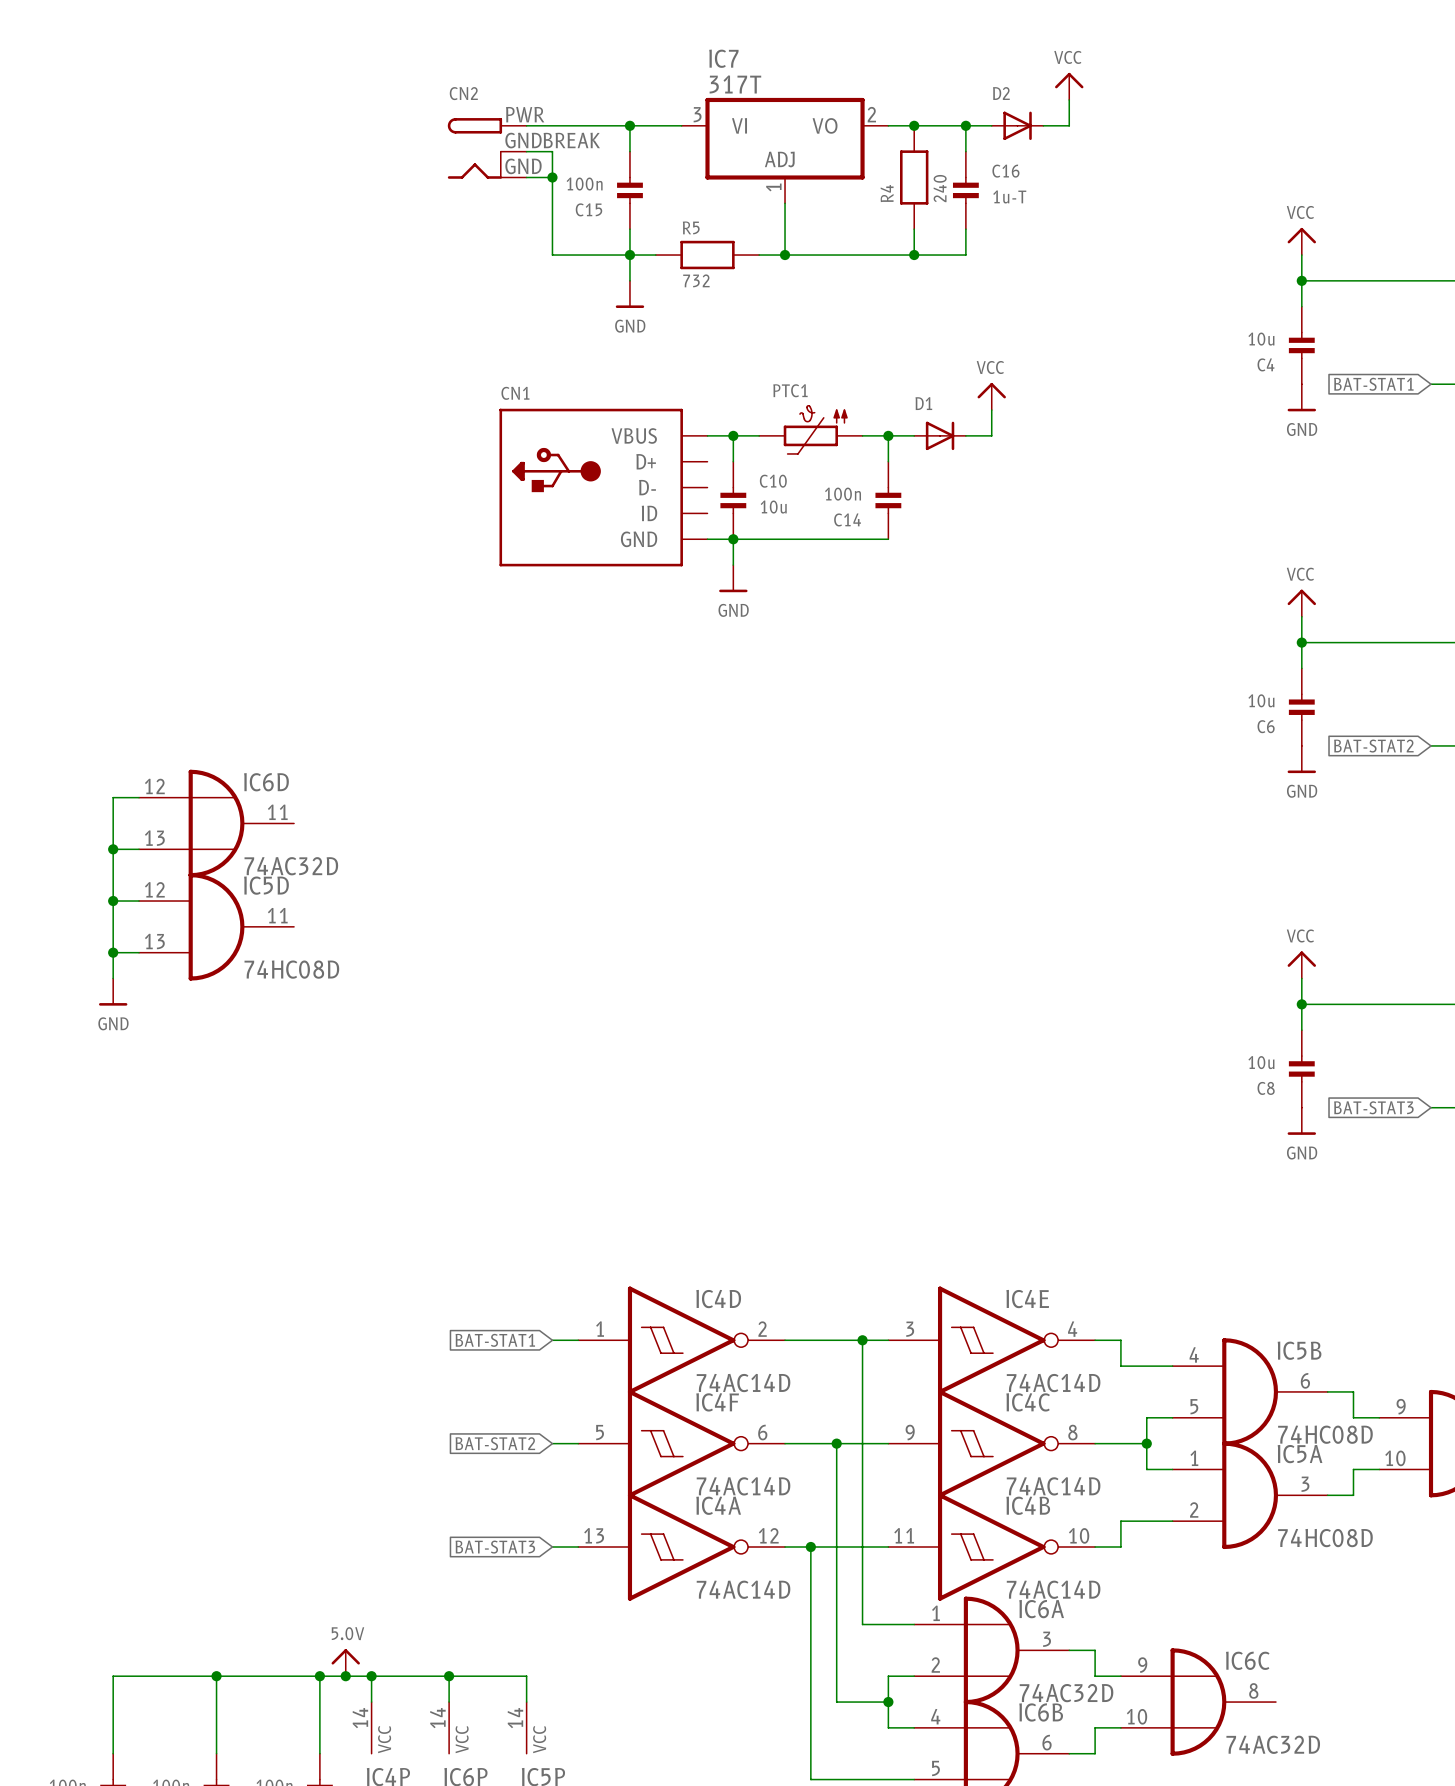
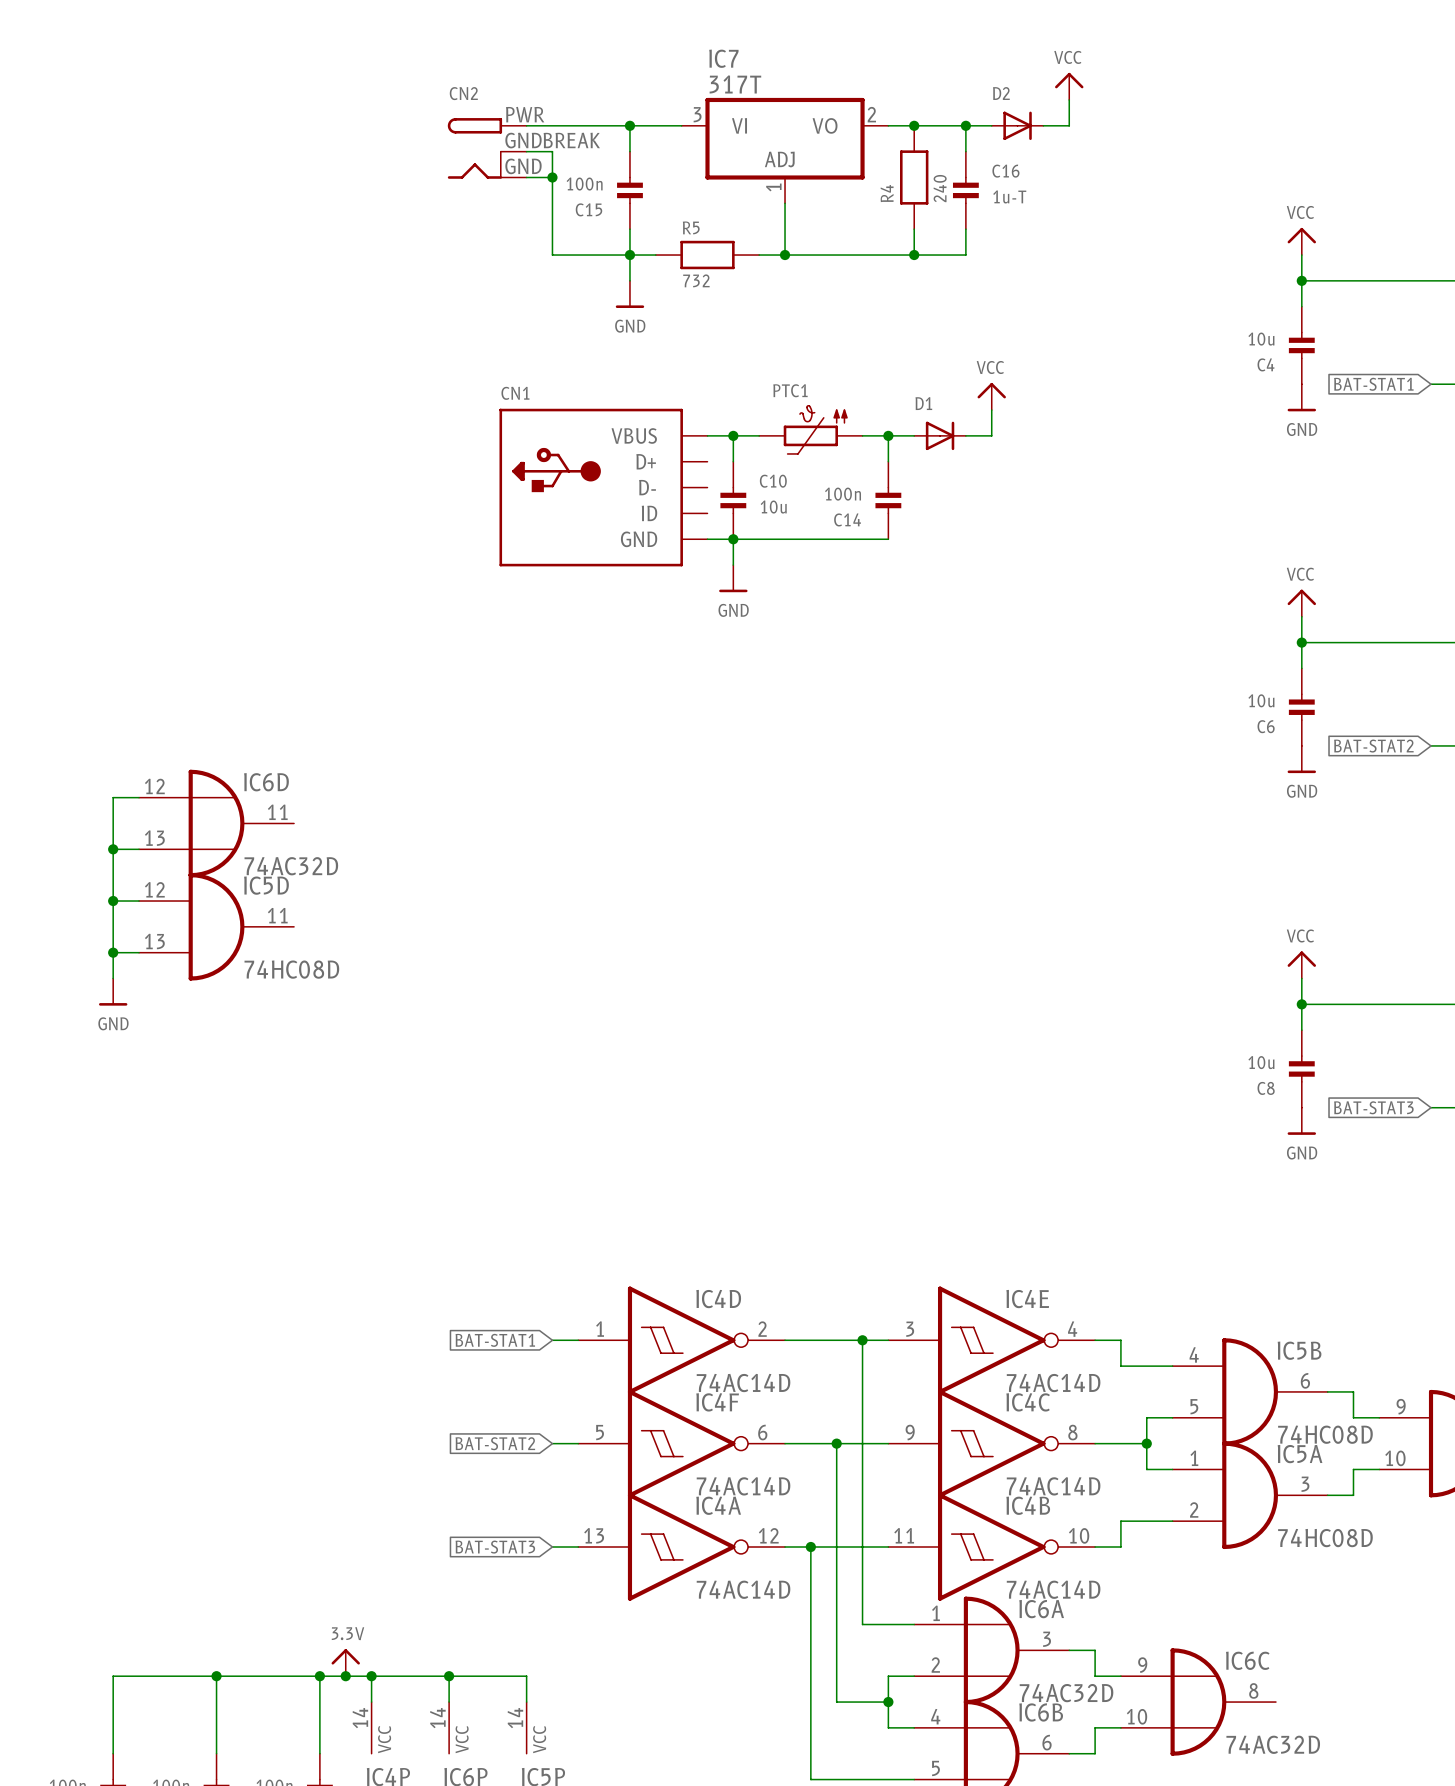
power symbol: 5.0V (345, 1662) -> 3.3V (345, 1662)

